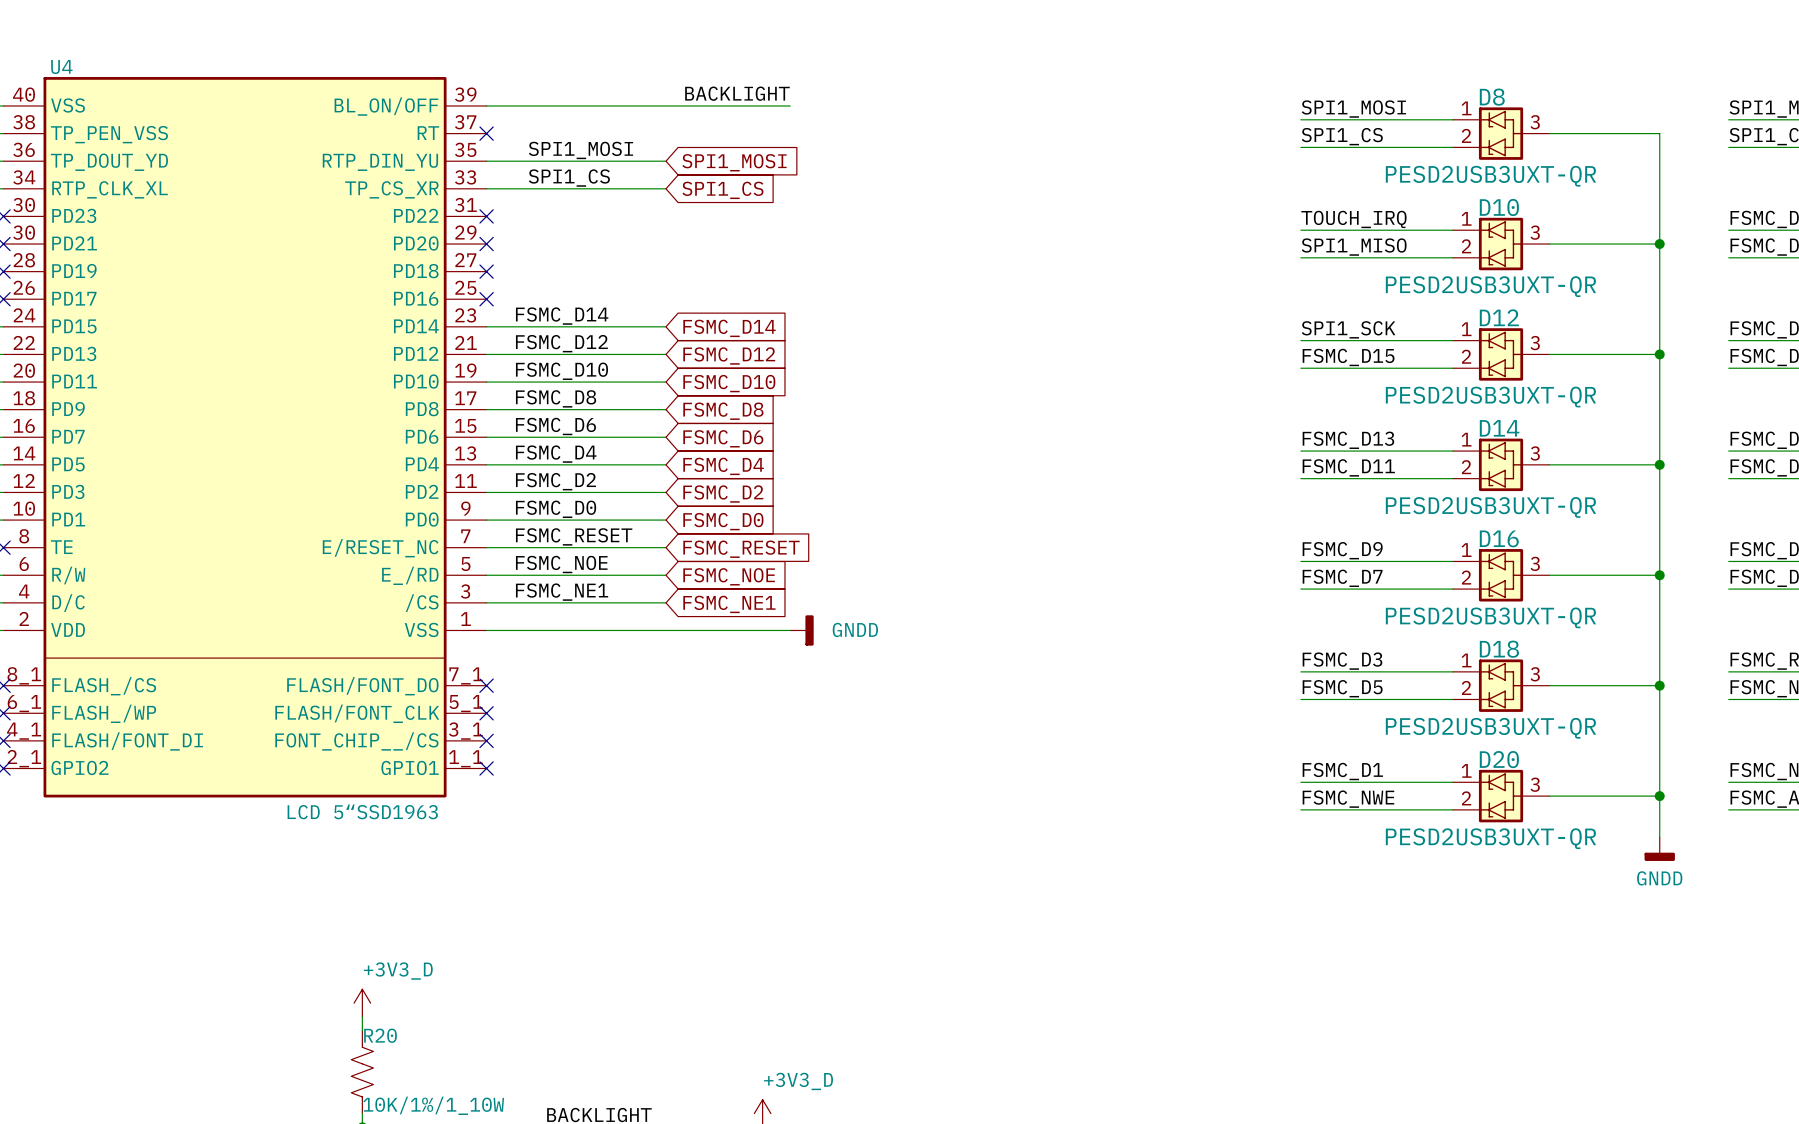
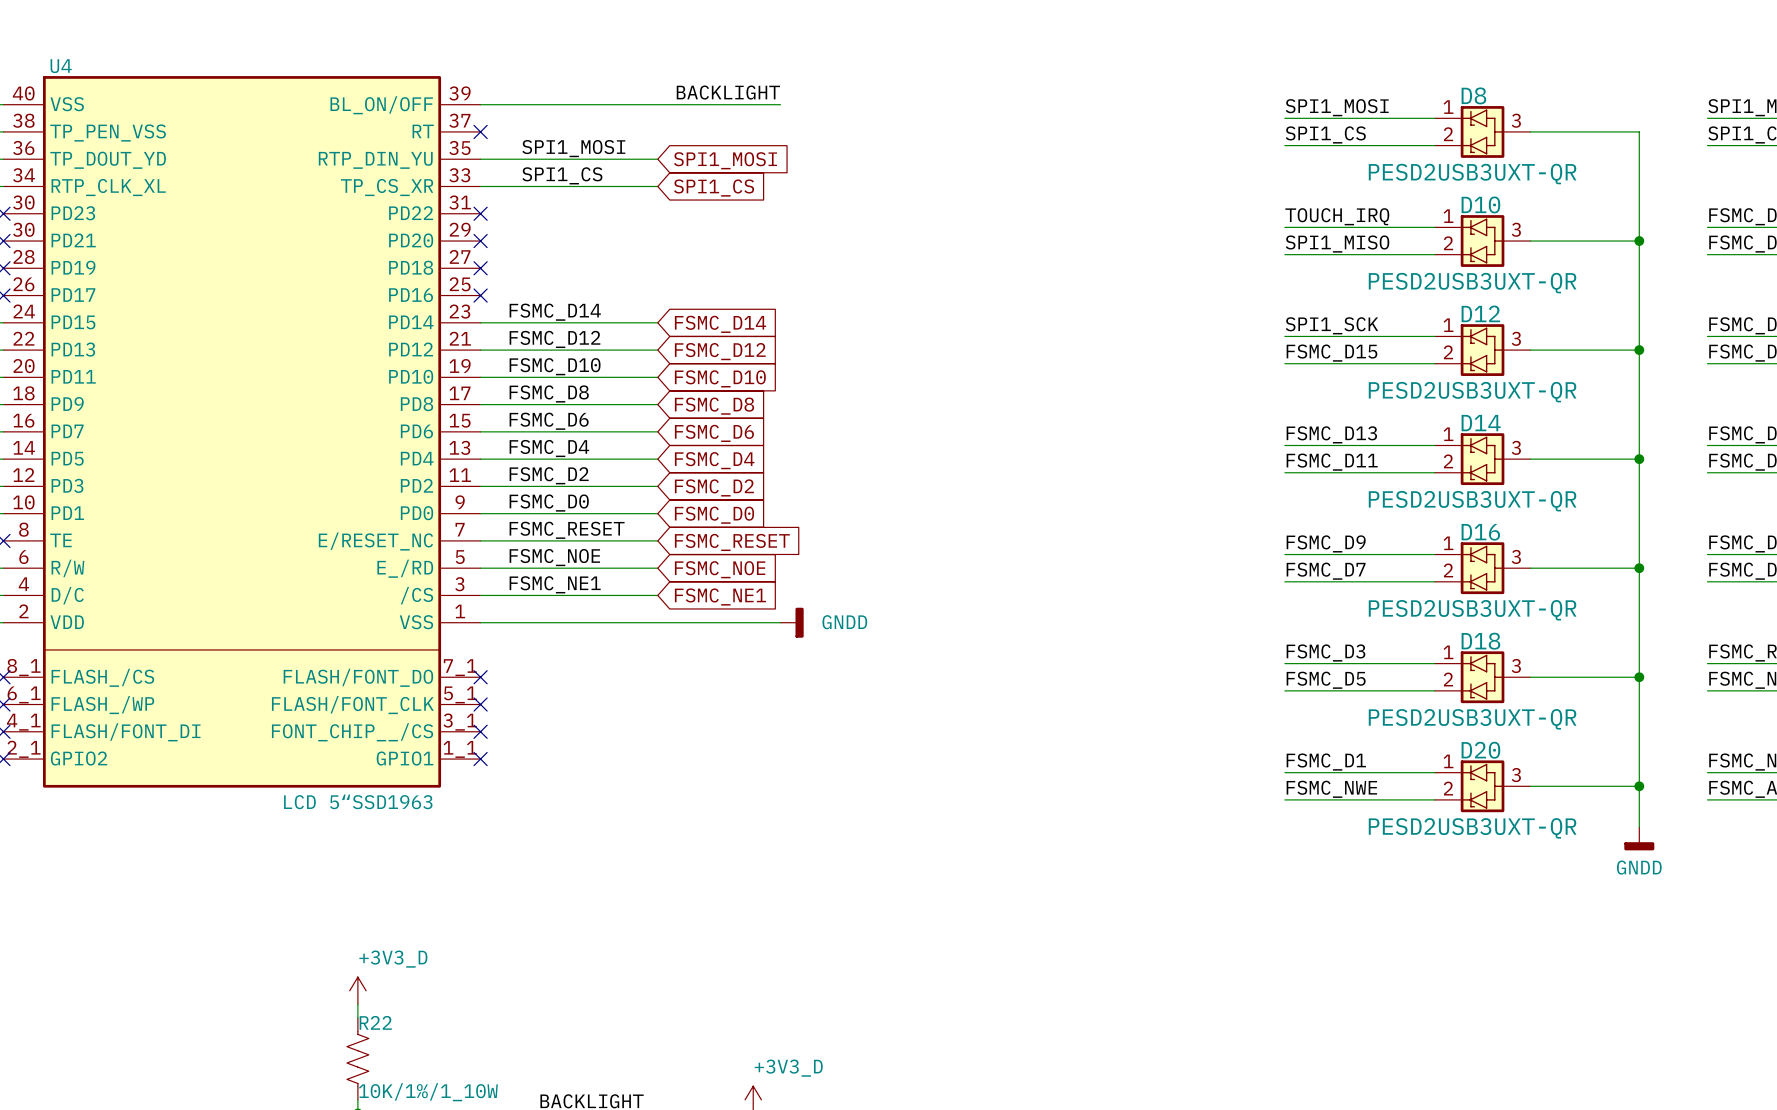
R20 name: R20 (380, 1035) -> R22 (375, 1022)

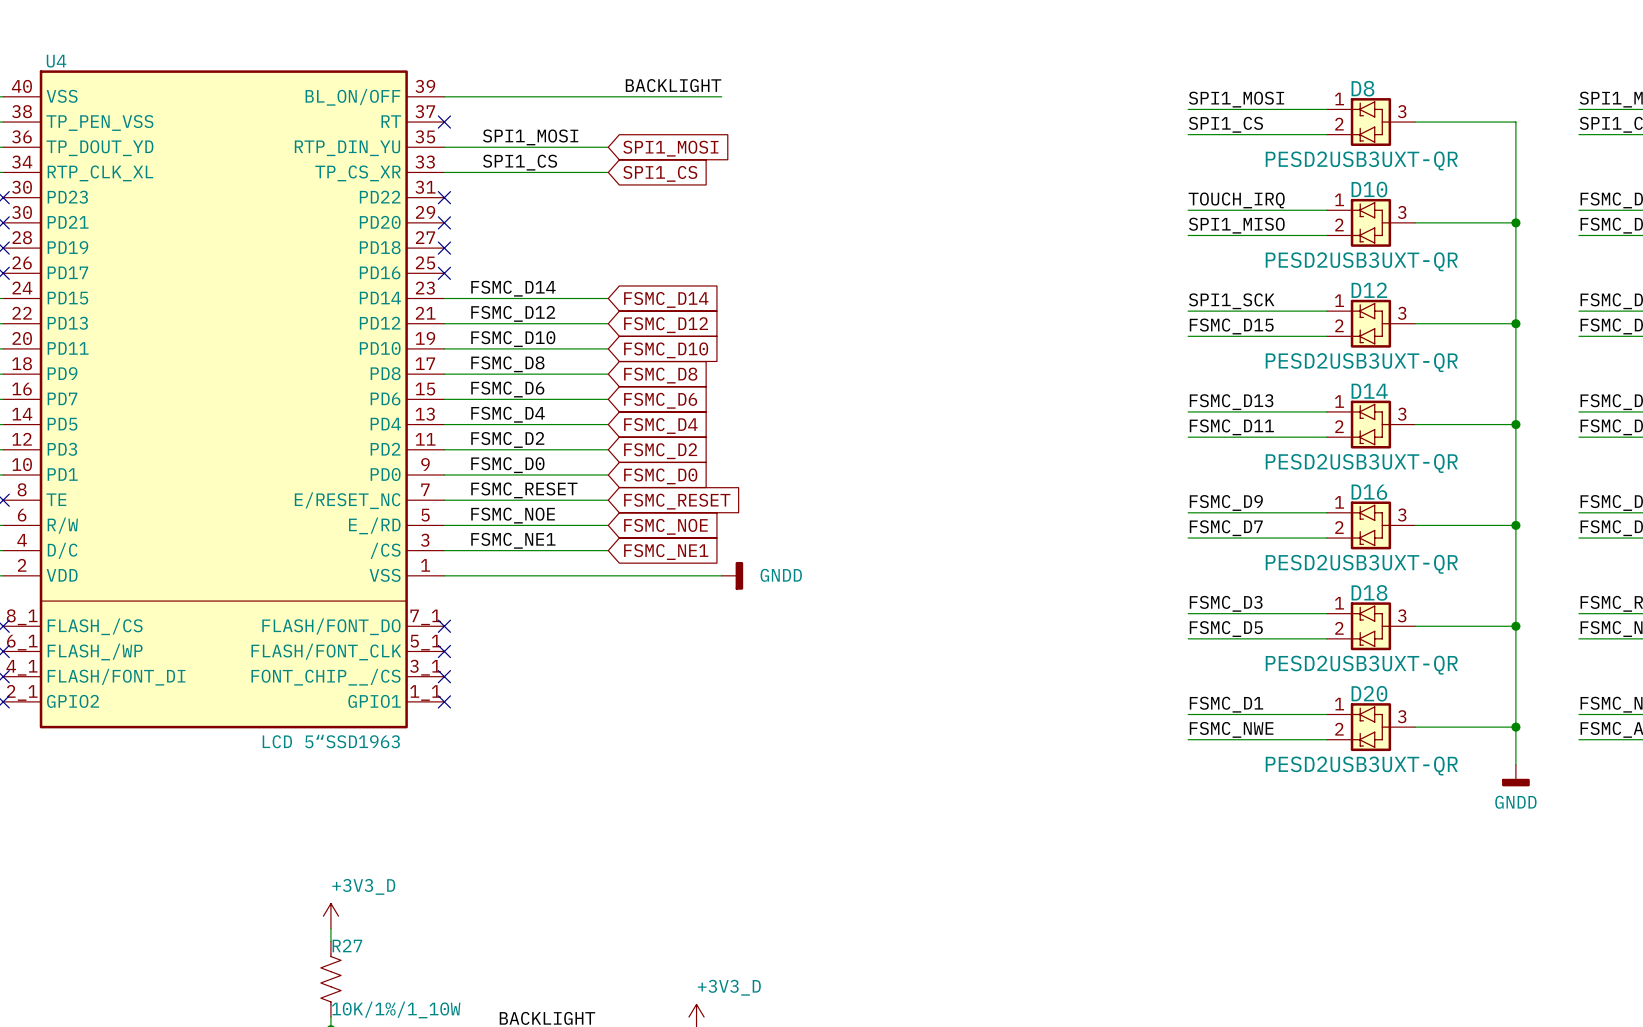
R22 name: R22 (375, 1022) -> R27 (347, 945)

